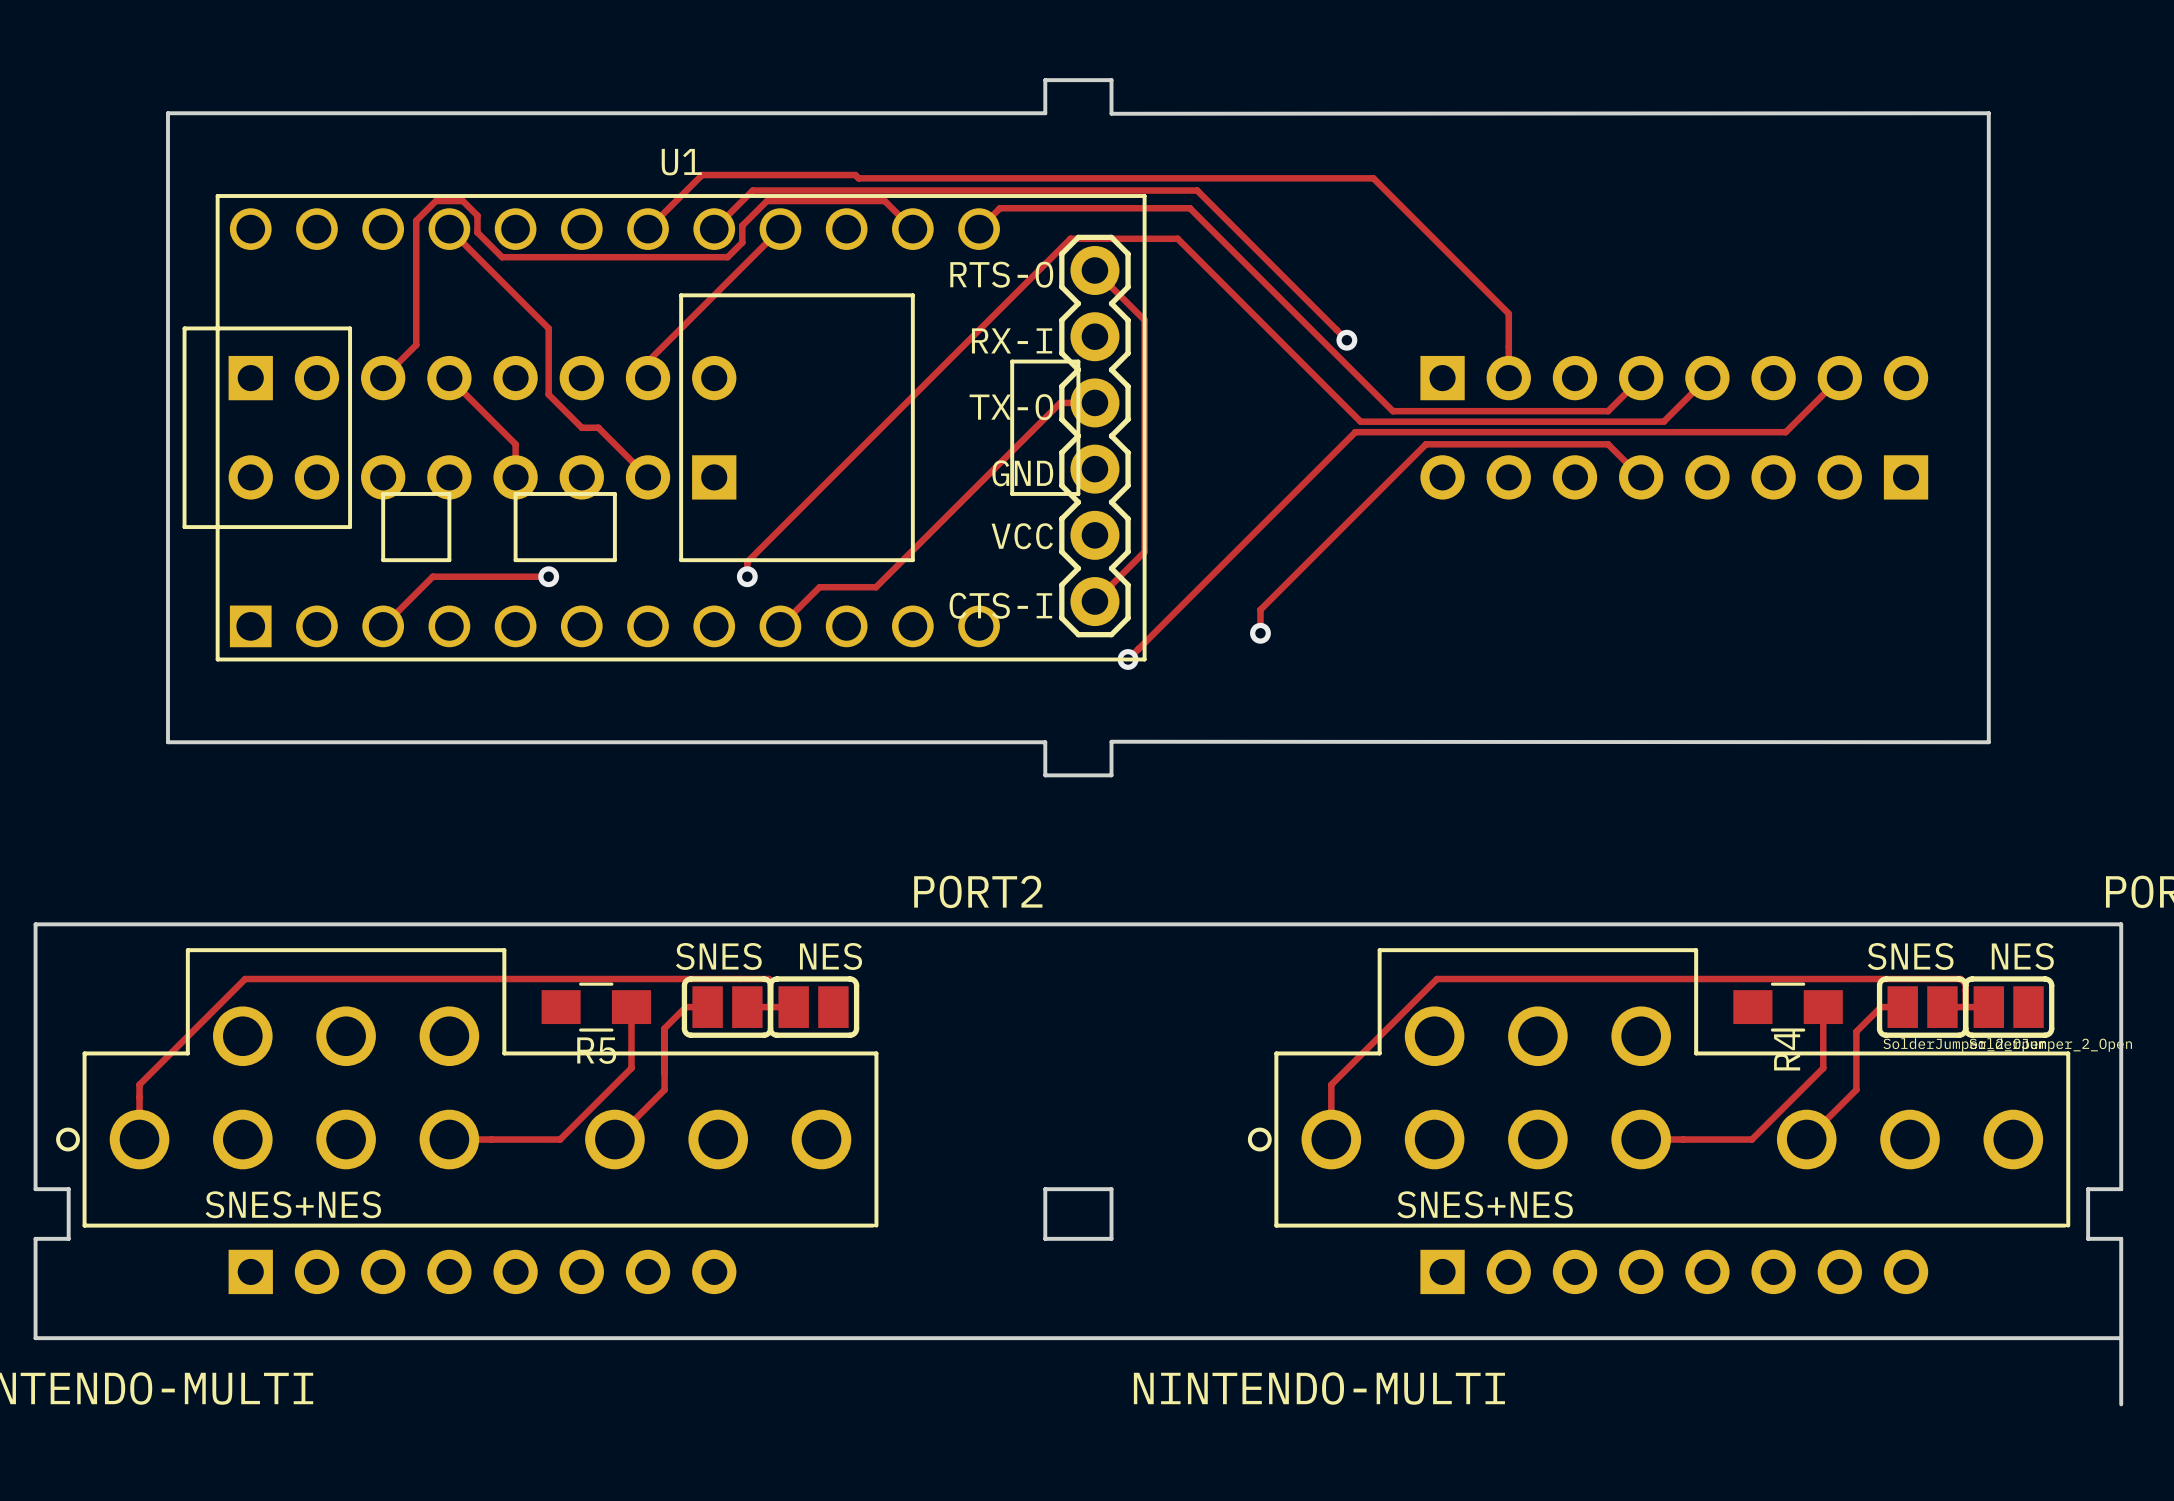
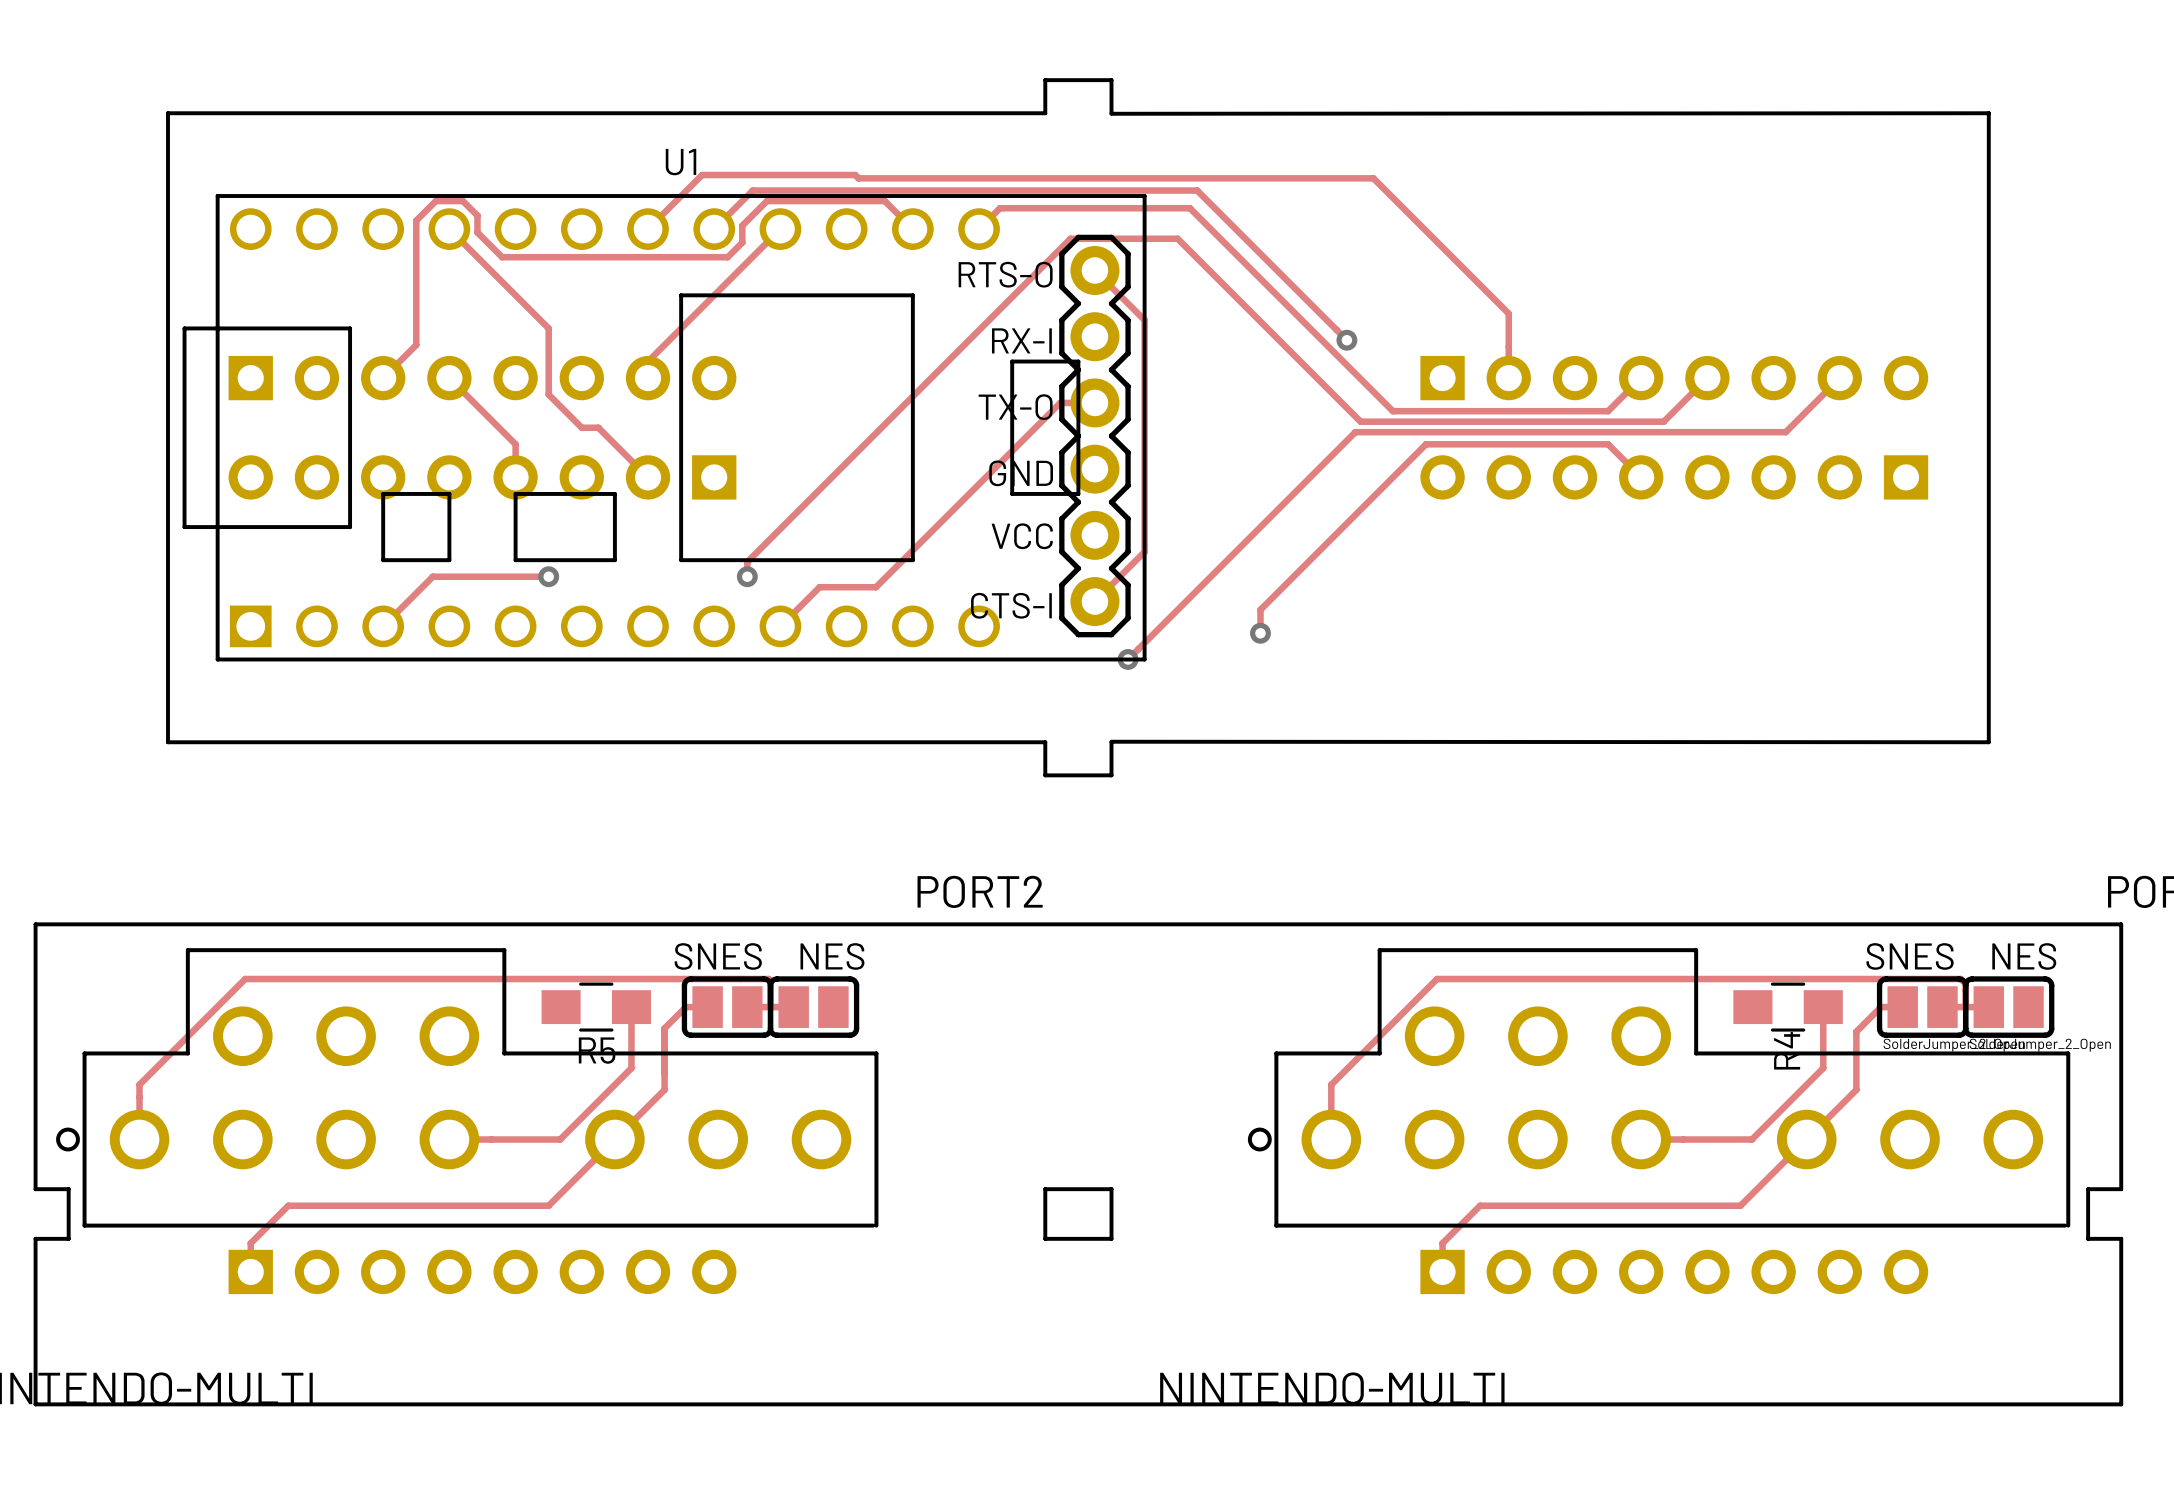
track: none -> (614, 1139) (548, 1205) (288, 1205) (250, 1243) (250, 1271)
track: none -> (1806, 1139) (1740, 1205) (1480, 1205) (1442, 1243) (1442, 1271)
text: SNES+NES (293, 1204) -> none
text: SNES+NES (1485, 1204) -> none
board edge: (35, 1338) (2121, 1338) -> (35, 1338) (35, 1404) (2121, 1404)

